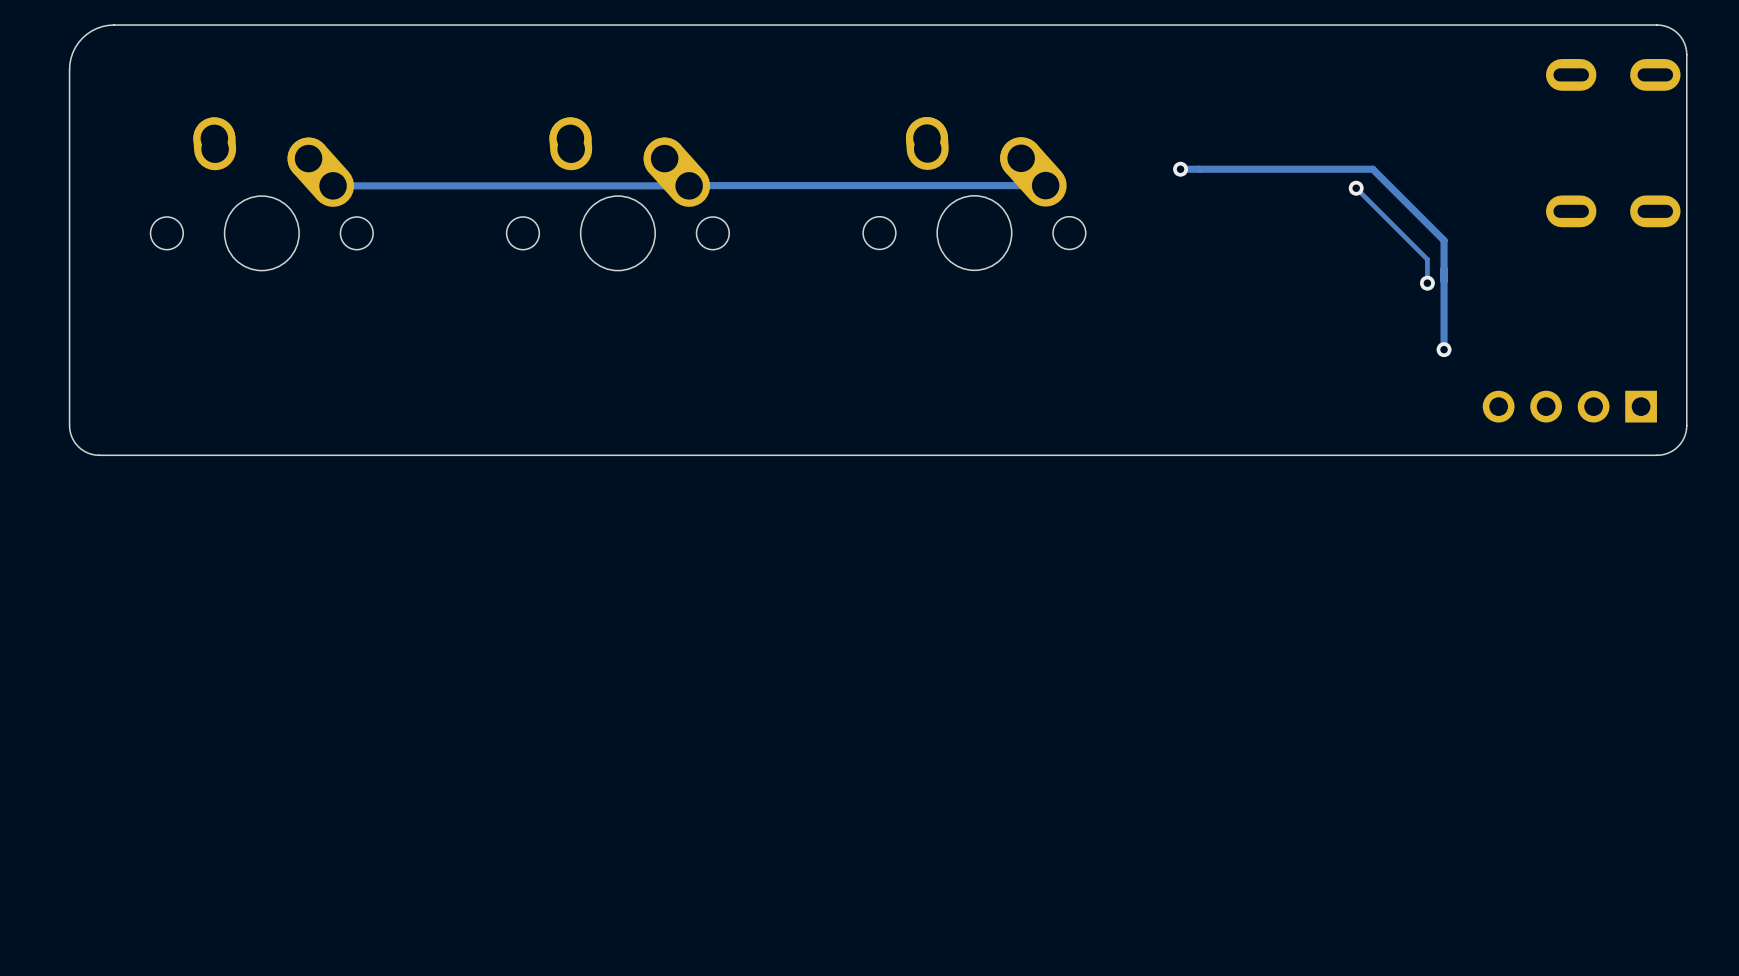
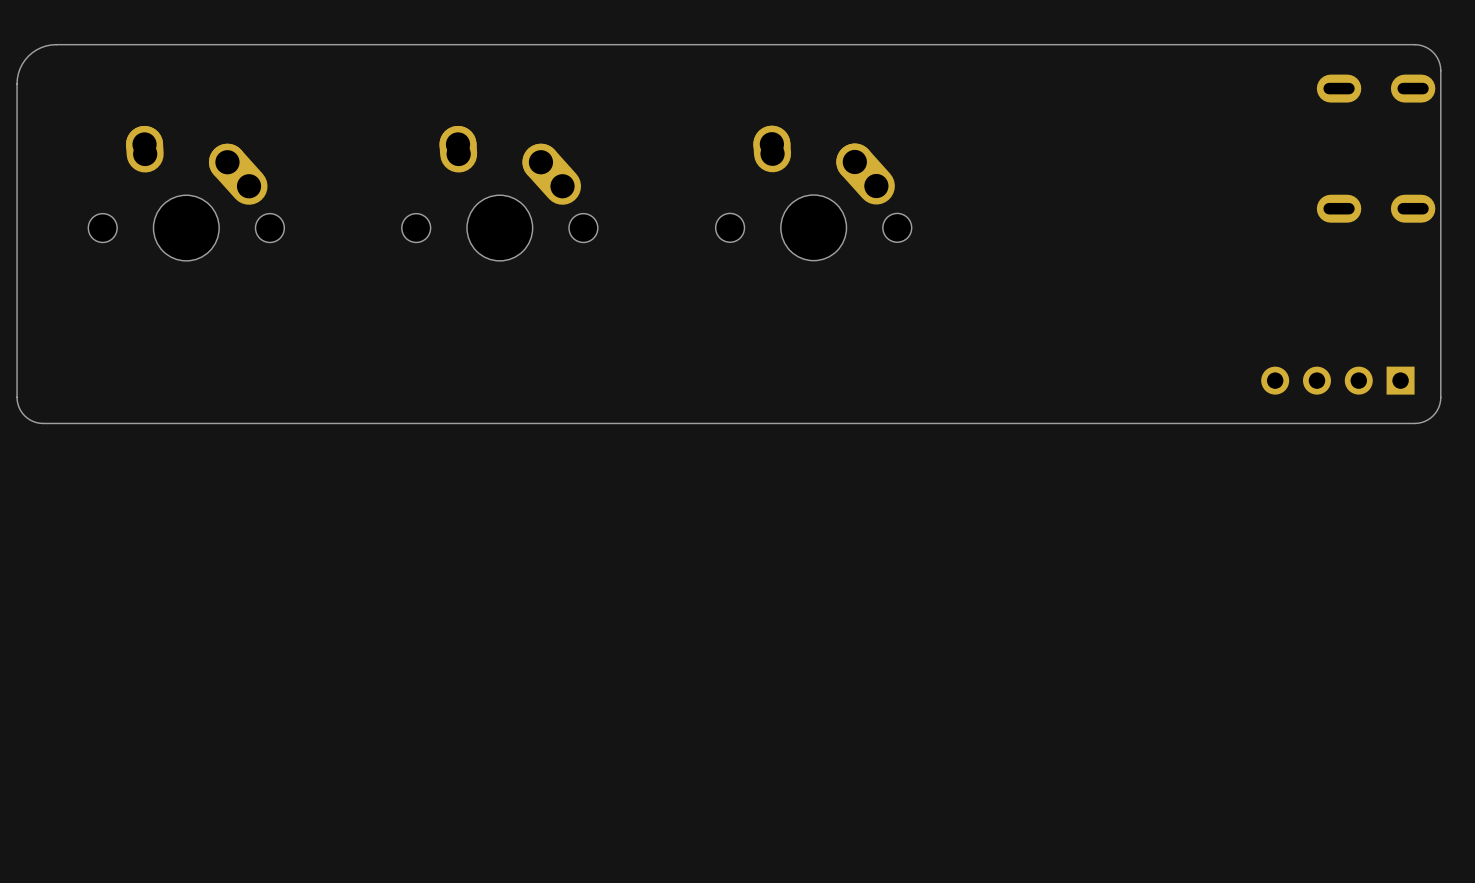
track: (1180, 169) (1372, 169) (1444, 240) (1444, 349) -> none
via: (1180, 169) -> none
track: (689, 185) (333, 185) -> none
track: (1045, 185) (689, 185) -> none
track: (1356, 188) (1427, 259) (1427, 283) -> none
via: (1356, 188) -> none
via: (1427, 283) -> none
via: (1444, 349) -> none

